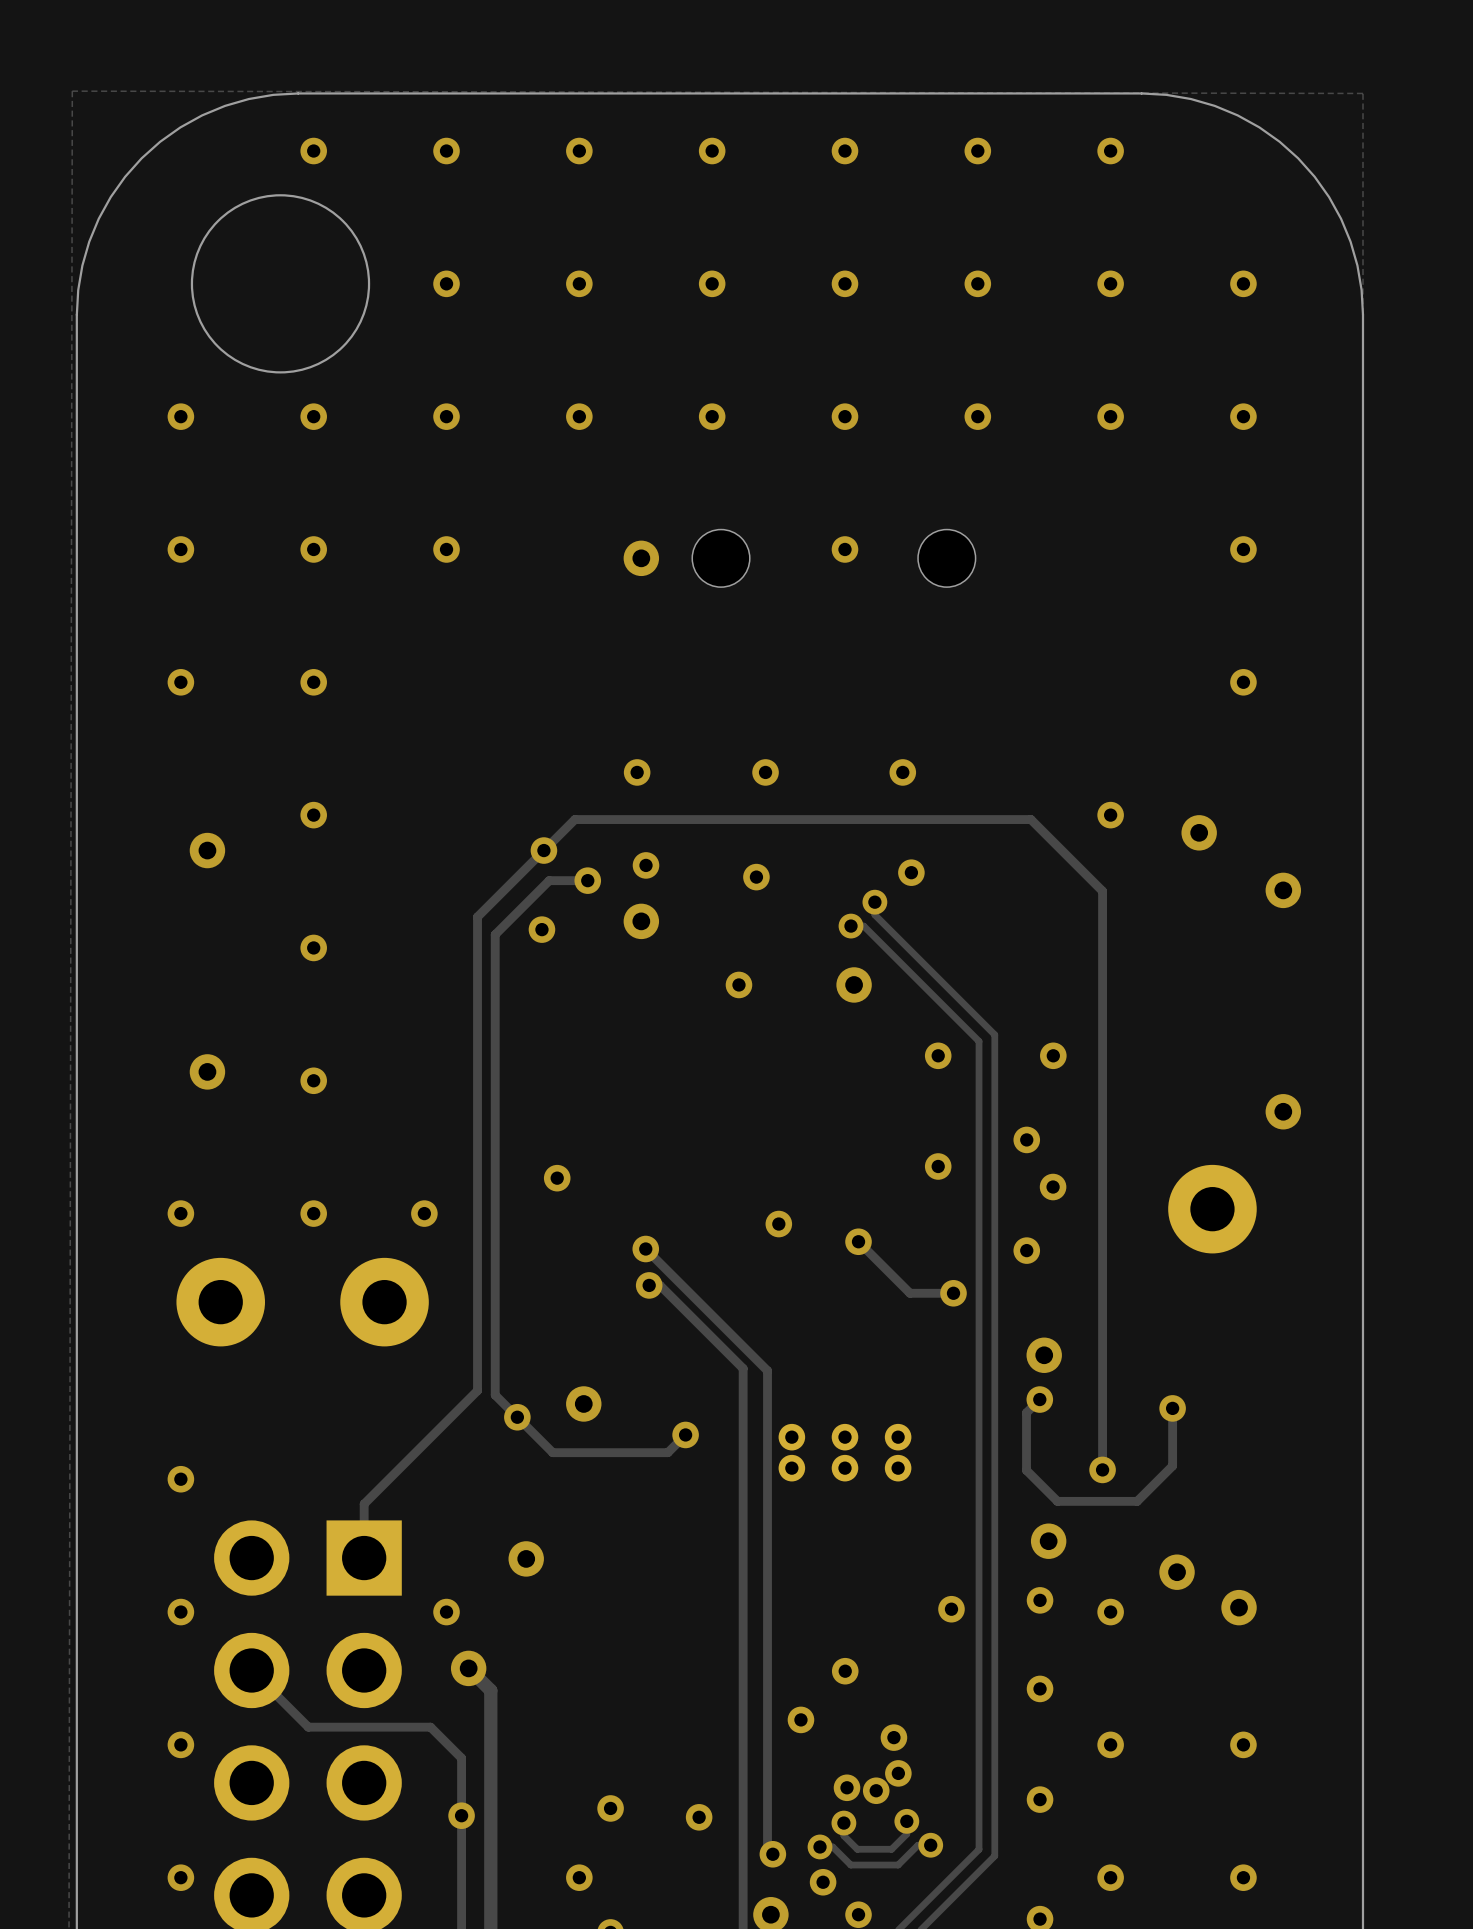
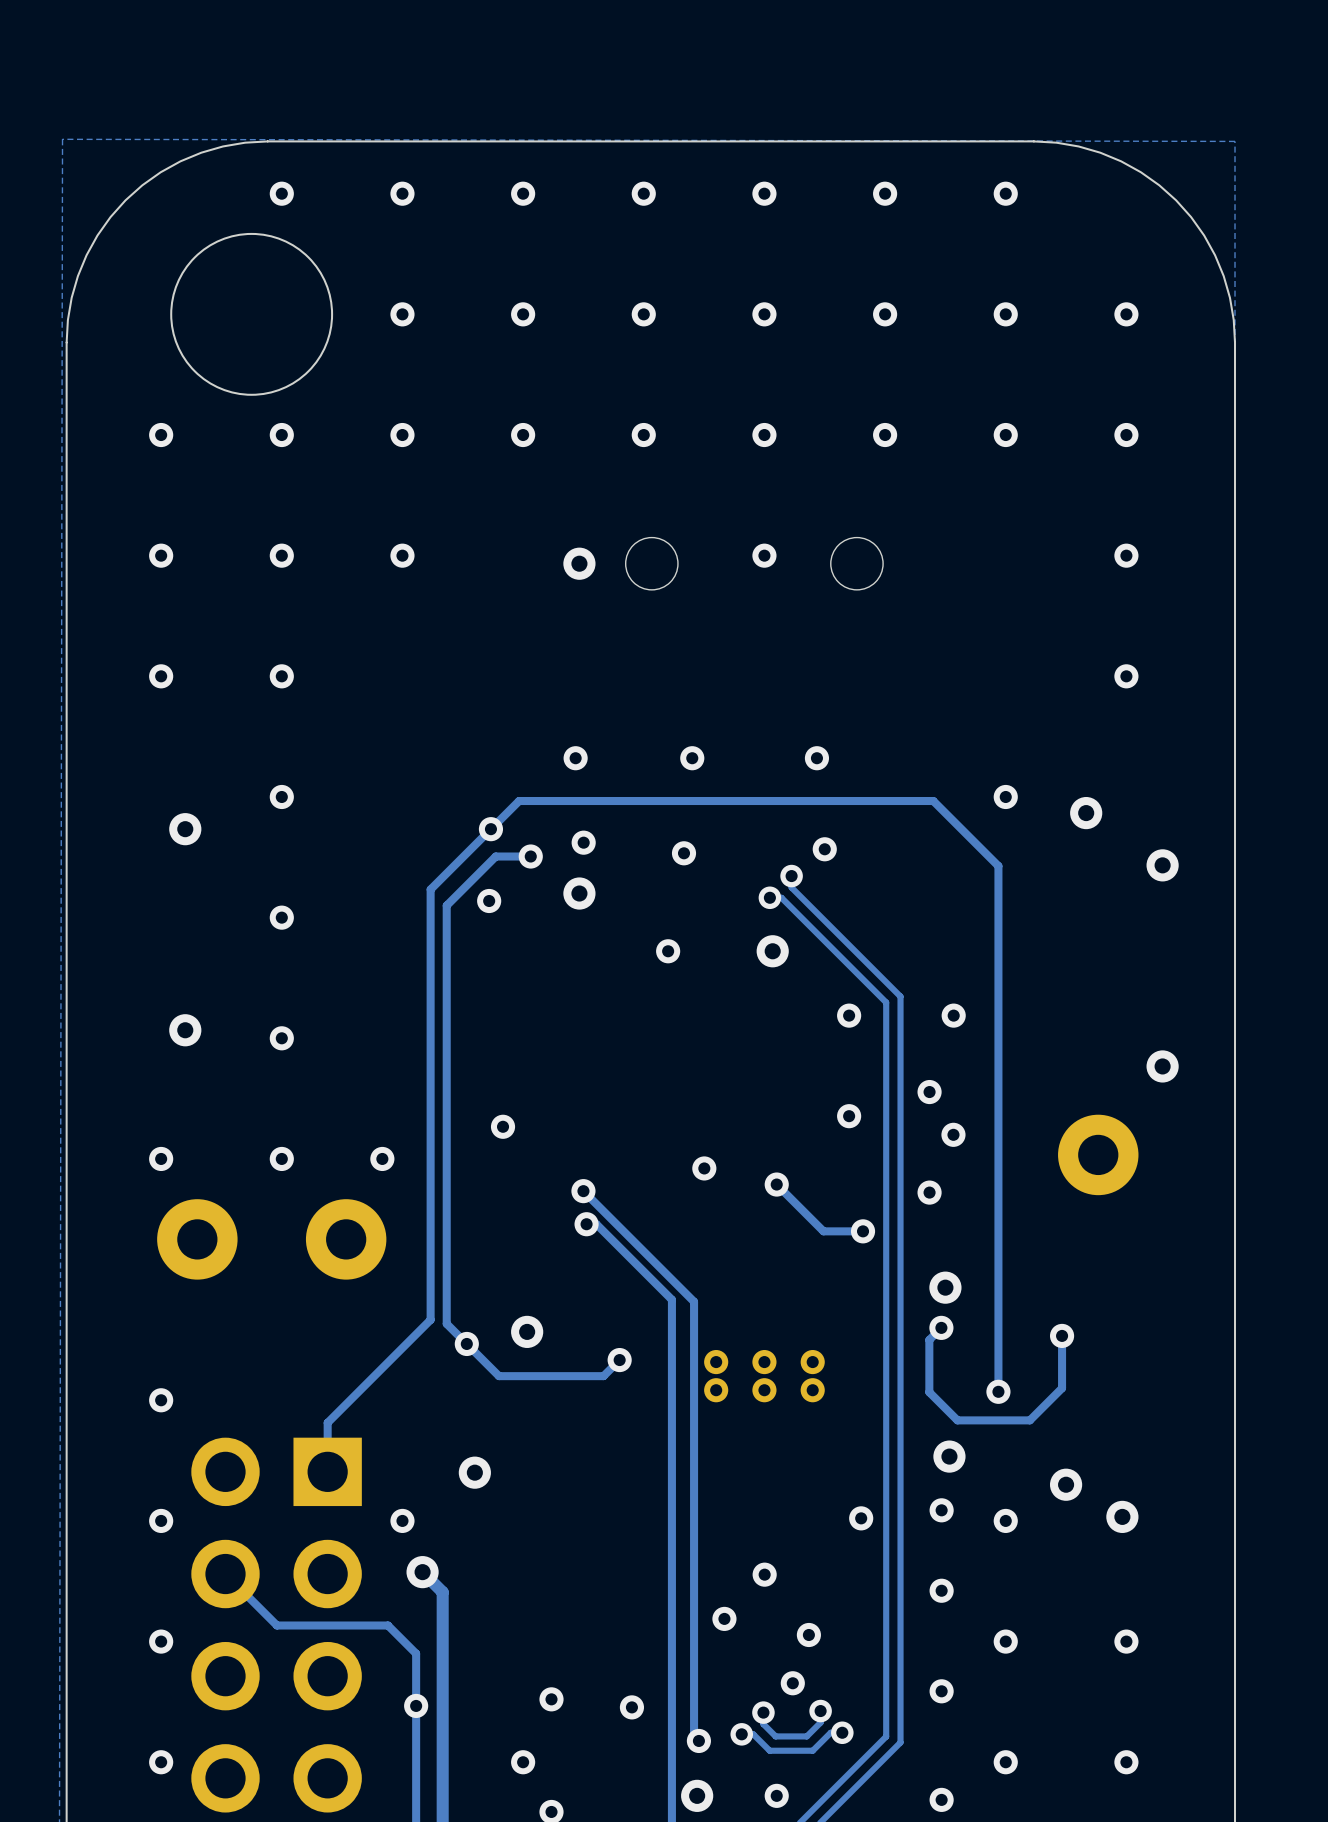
via: (898, 1773) -> none
via: (847, 1787) -> none
via: (823, 1882) -> none

